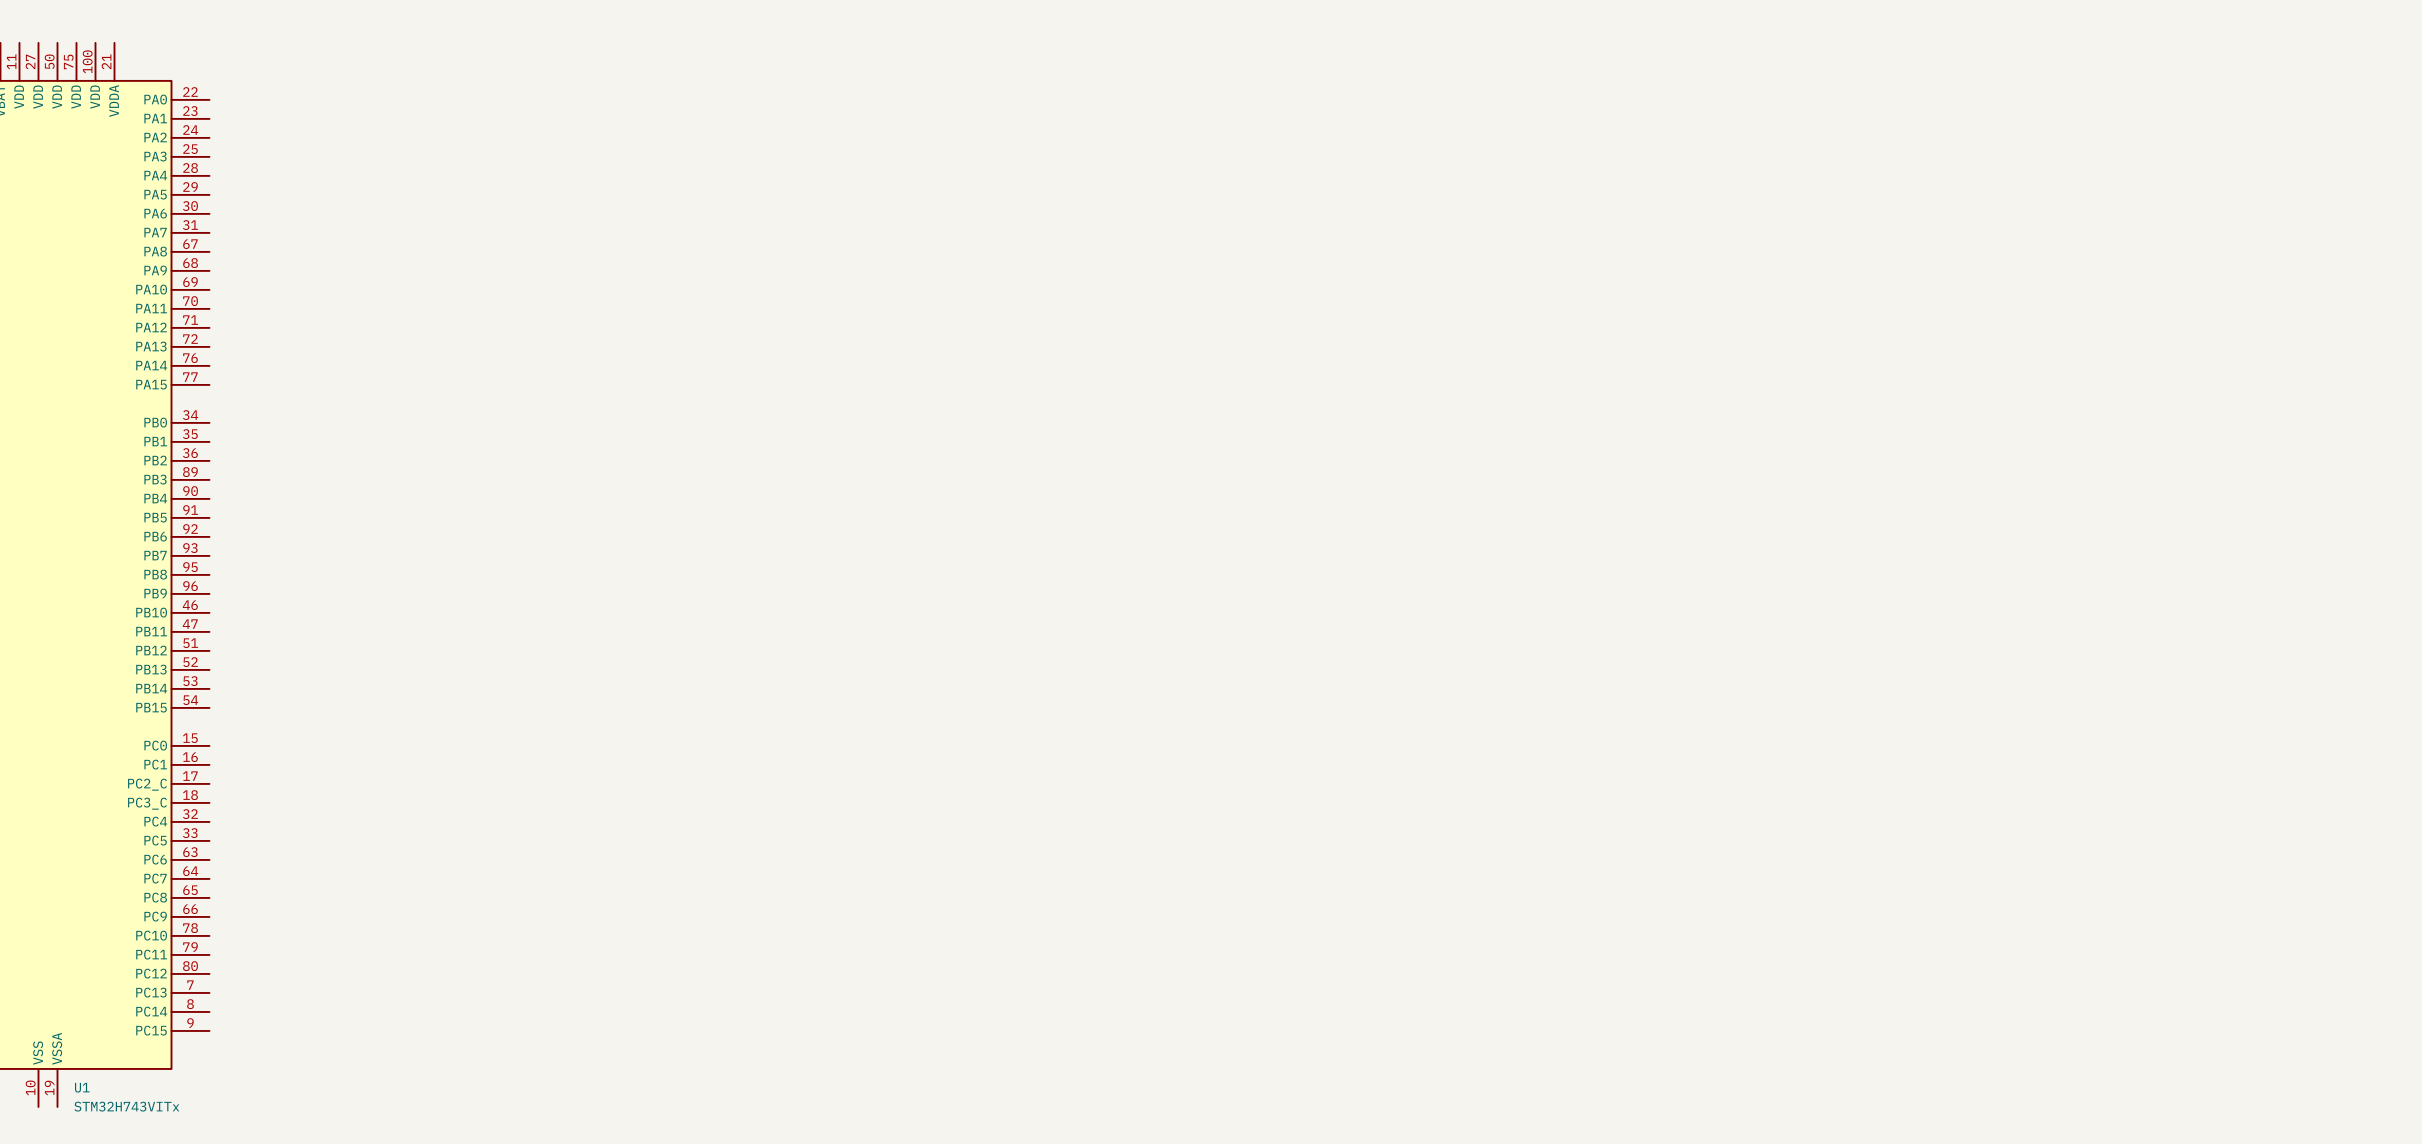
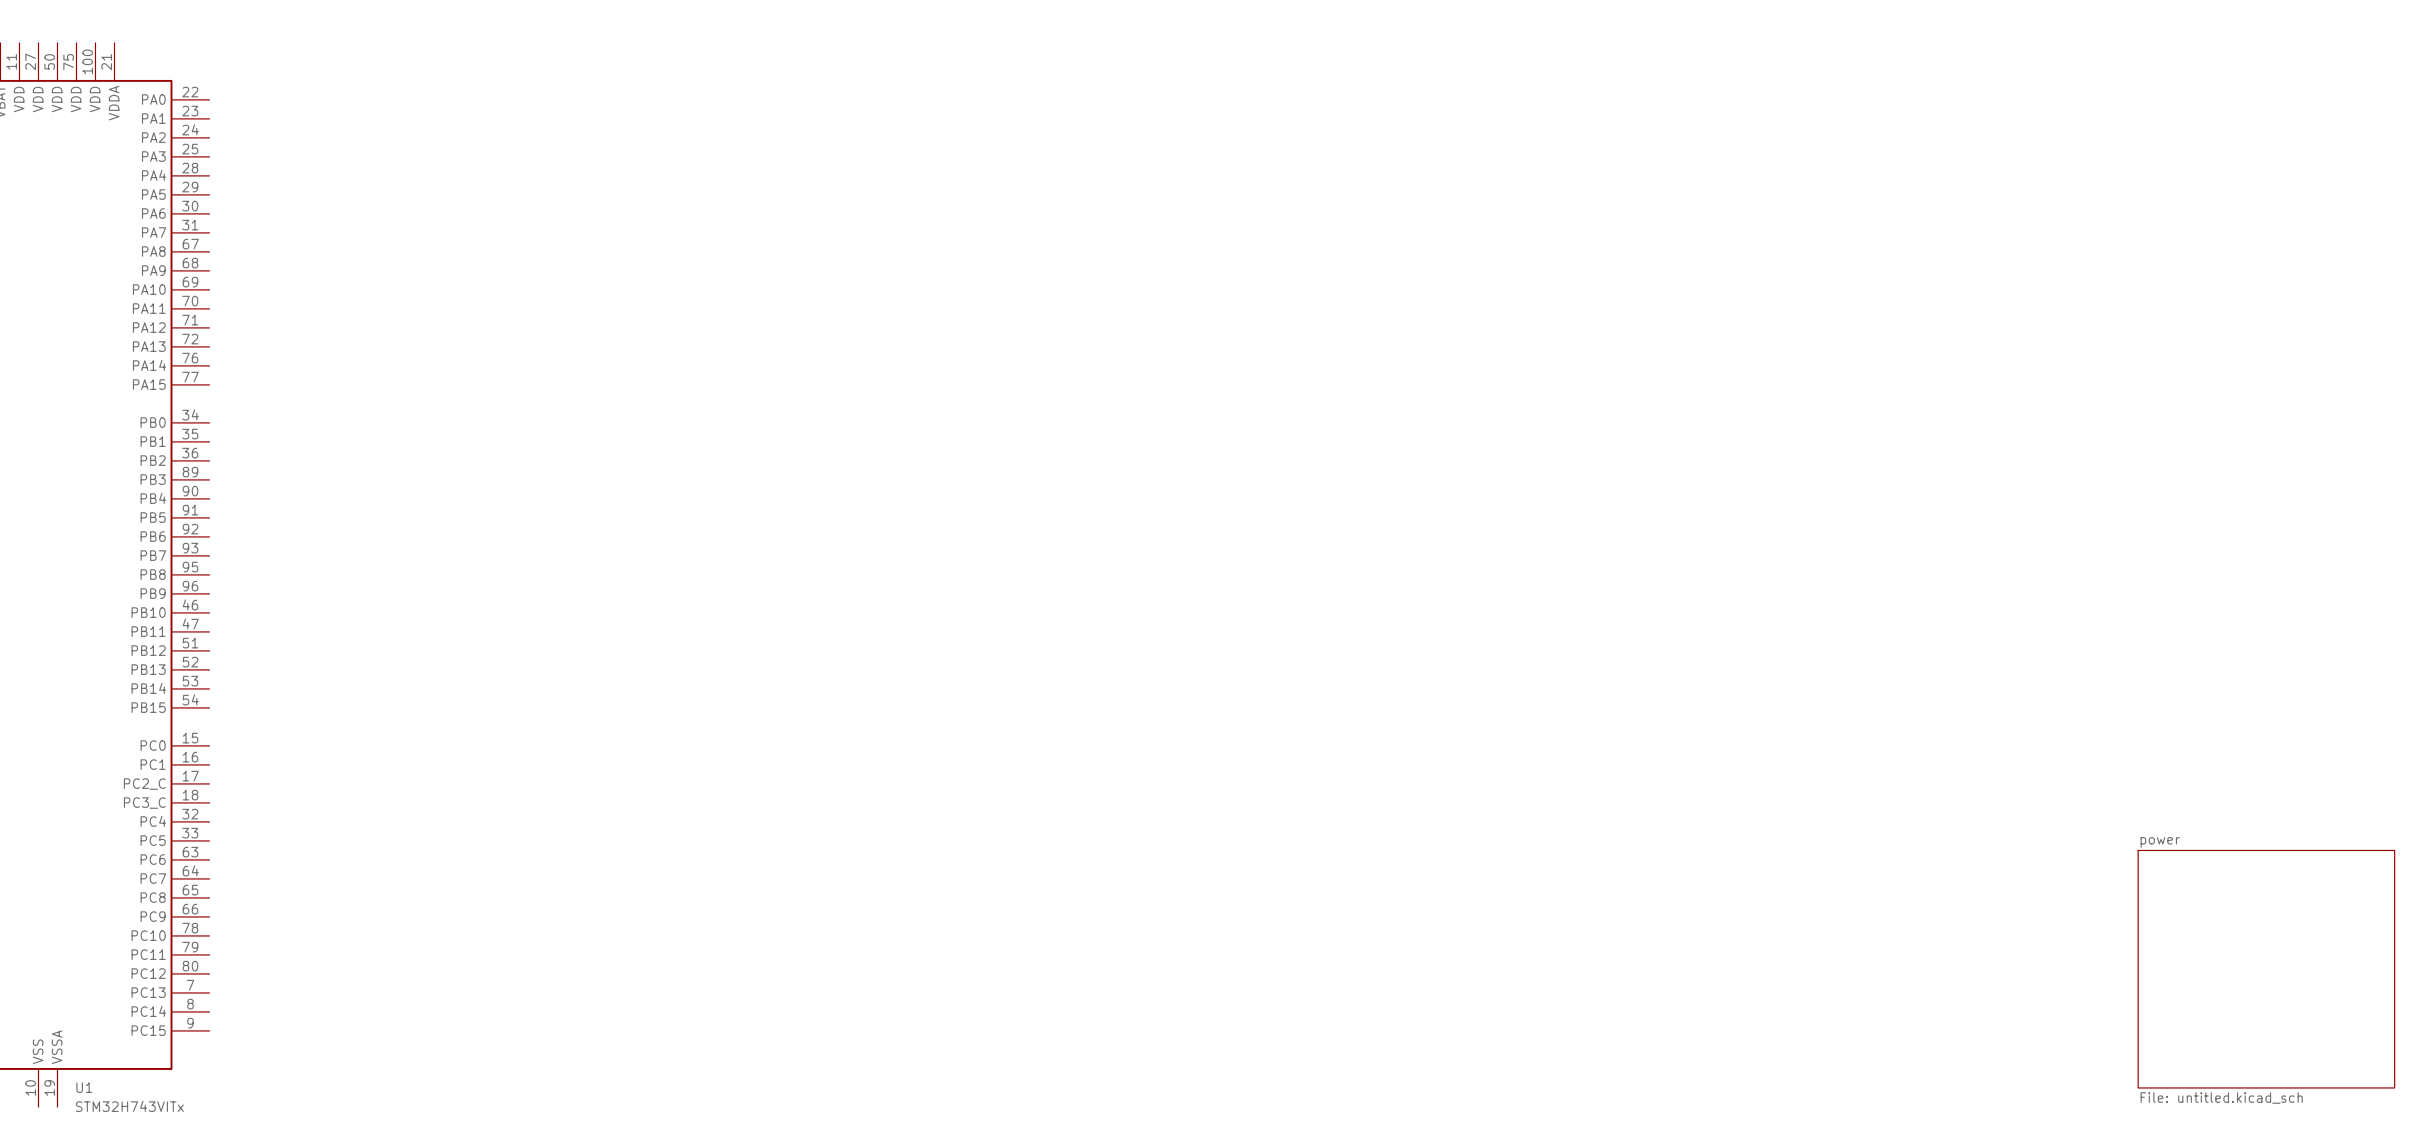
sheet power: none -> File: untitled.kicad_sch (2266, 969)

